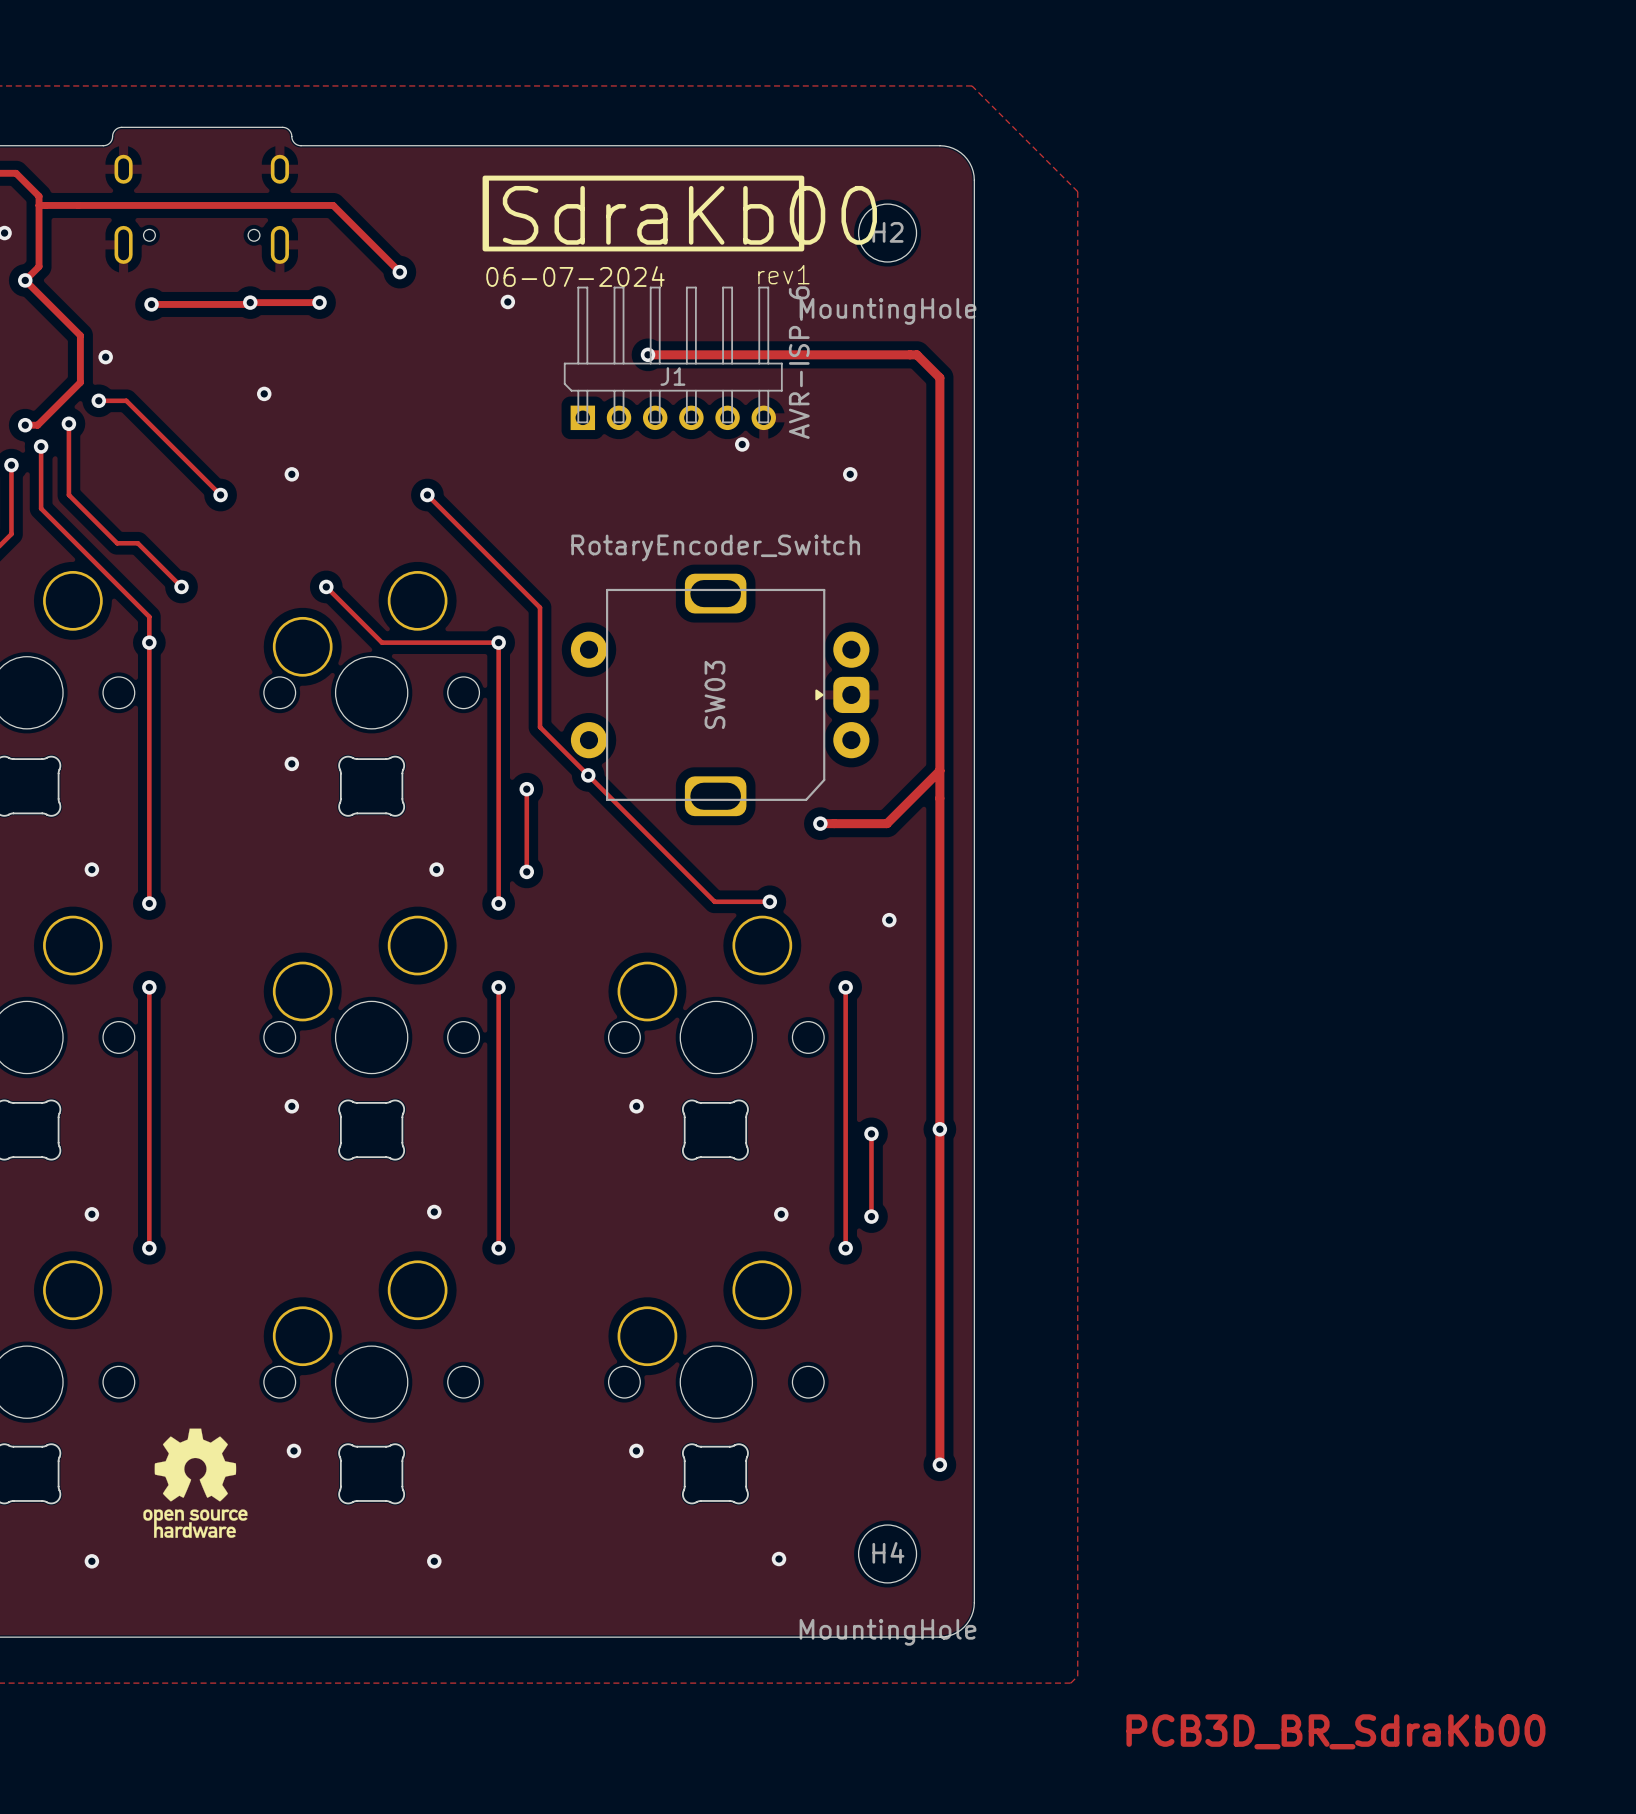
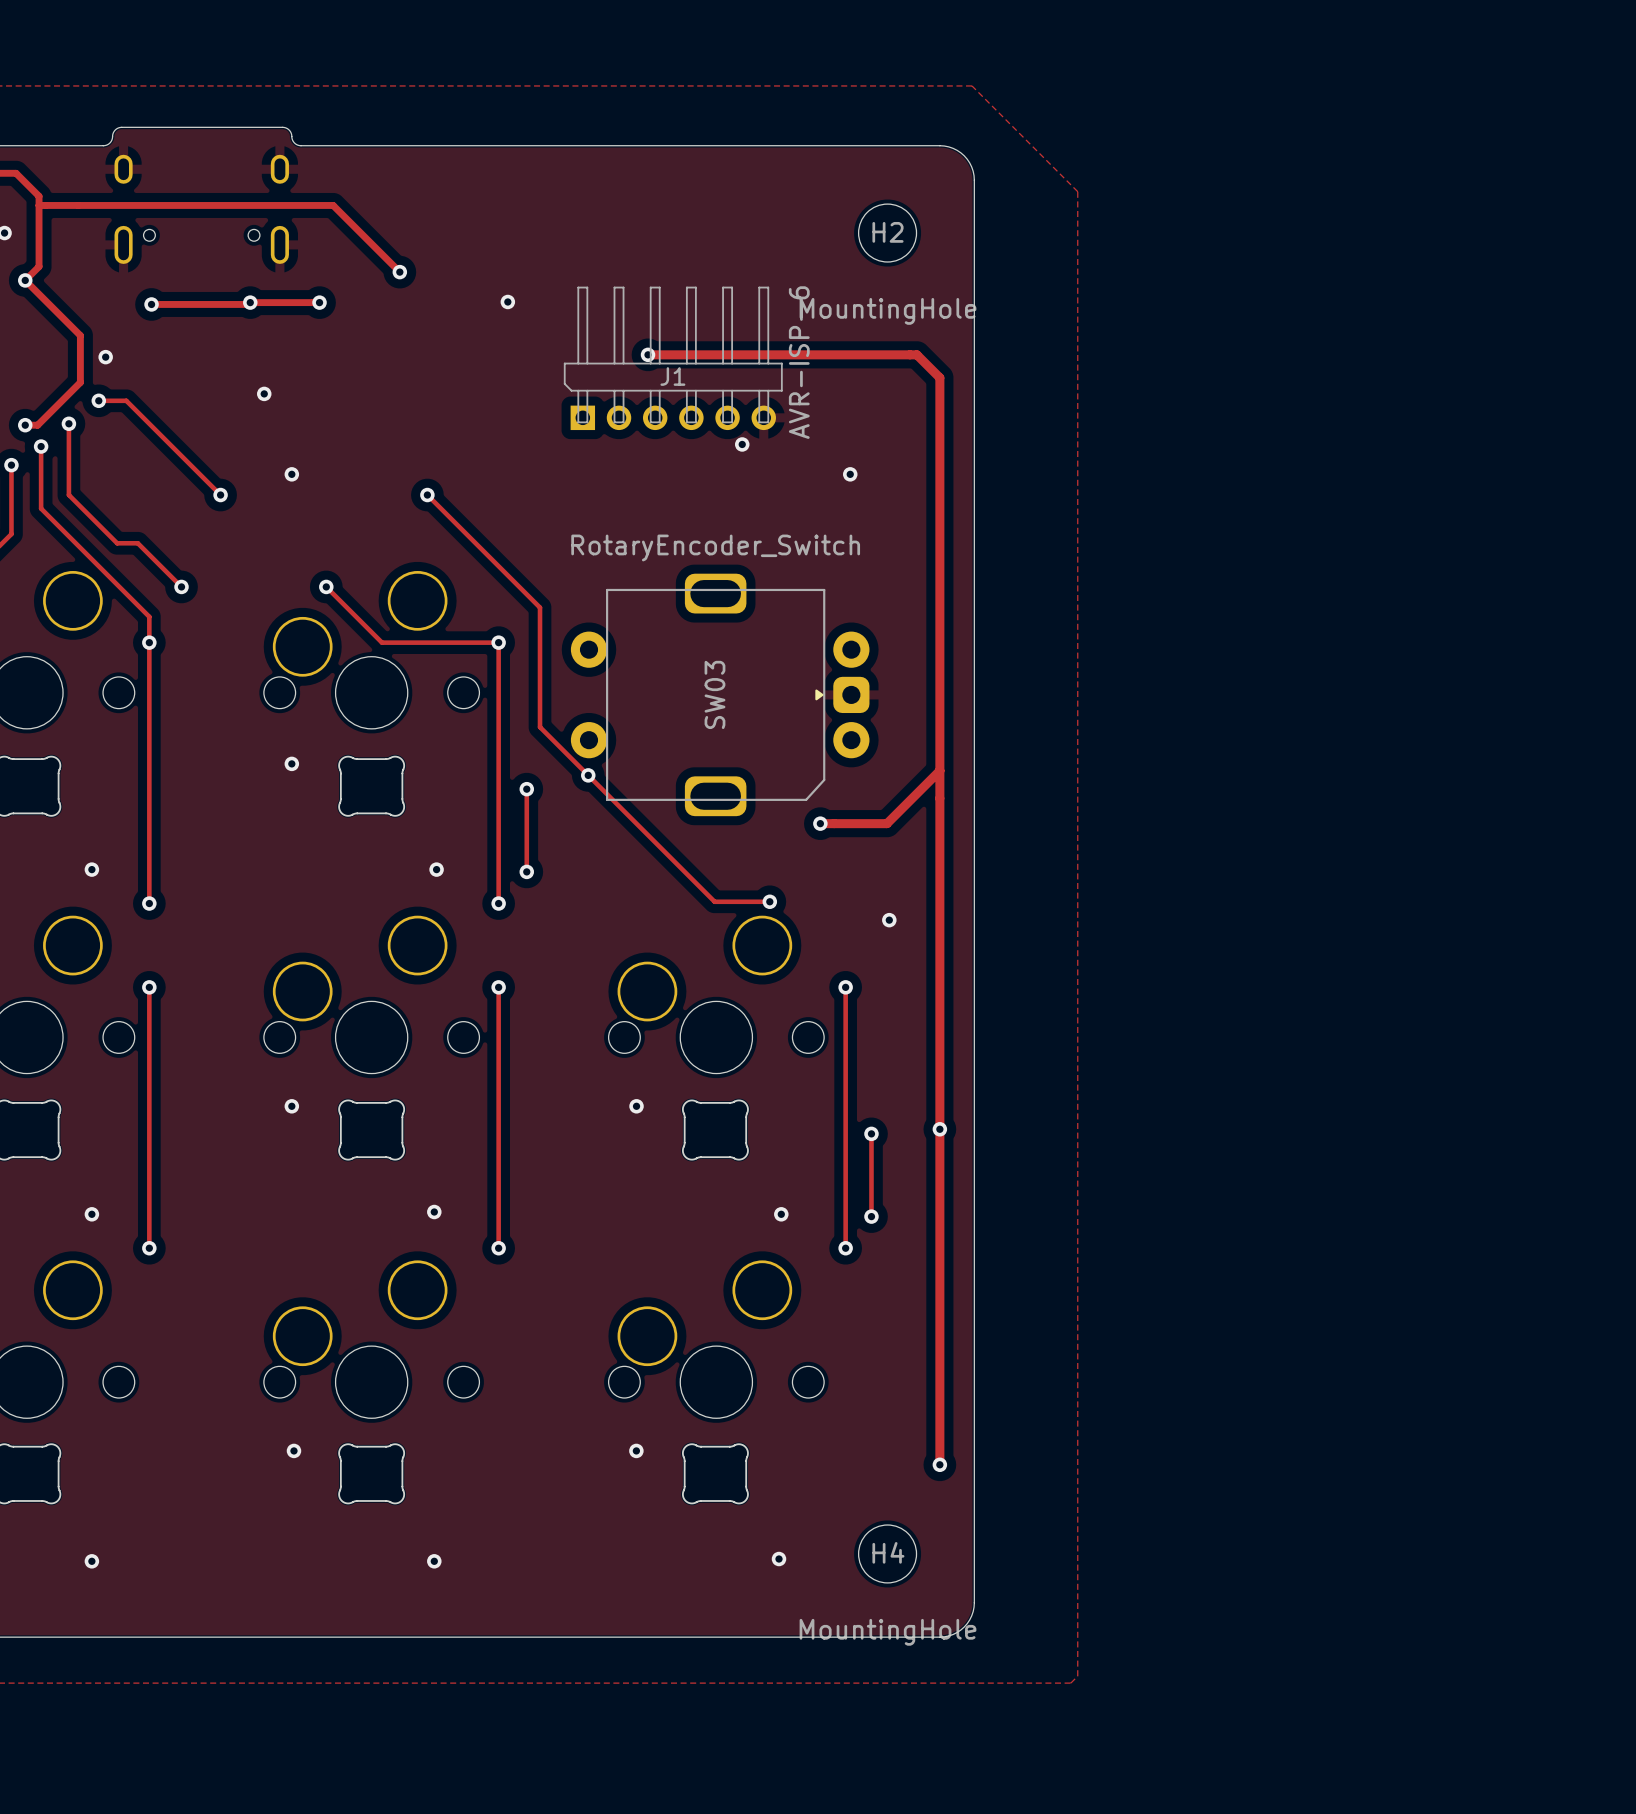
drawing: [482, 175, 805, 252] -> none
text: SdraKb00 (689, 215) -> none
text: rev1 (783, 274) -> none
text: 06-07-2024 (575, 276) -> none
drawing: [143, 1428, 248, 1538] -> none
text: PCB3D_BR_SdraKb00 (1335, 1731) -> none

